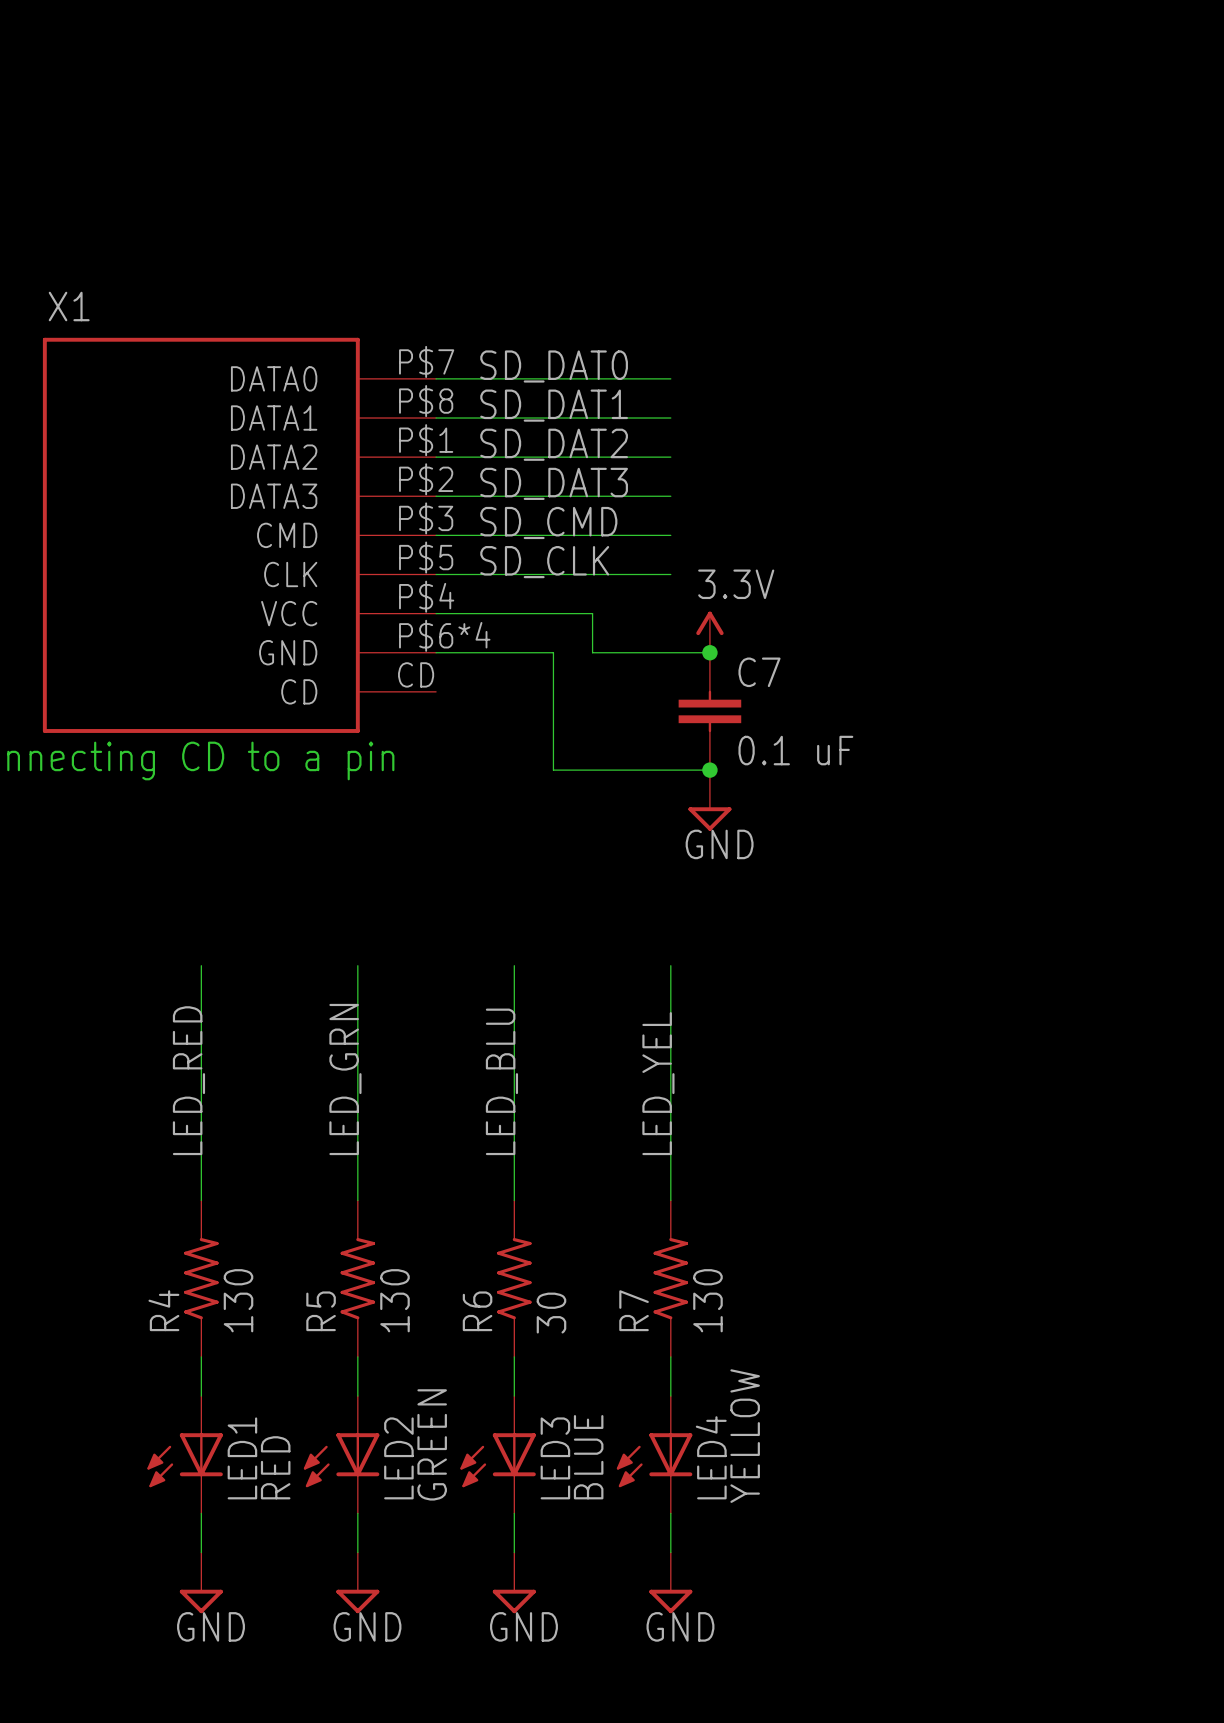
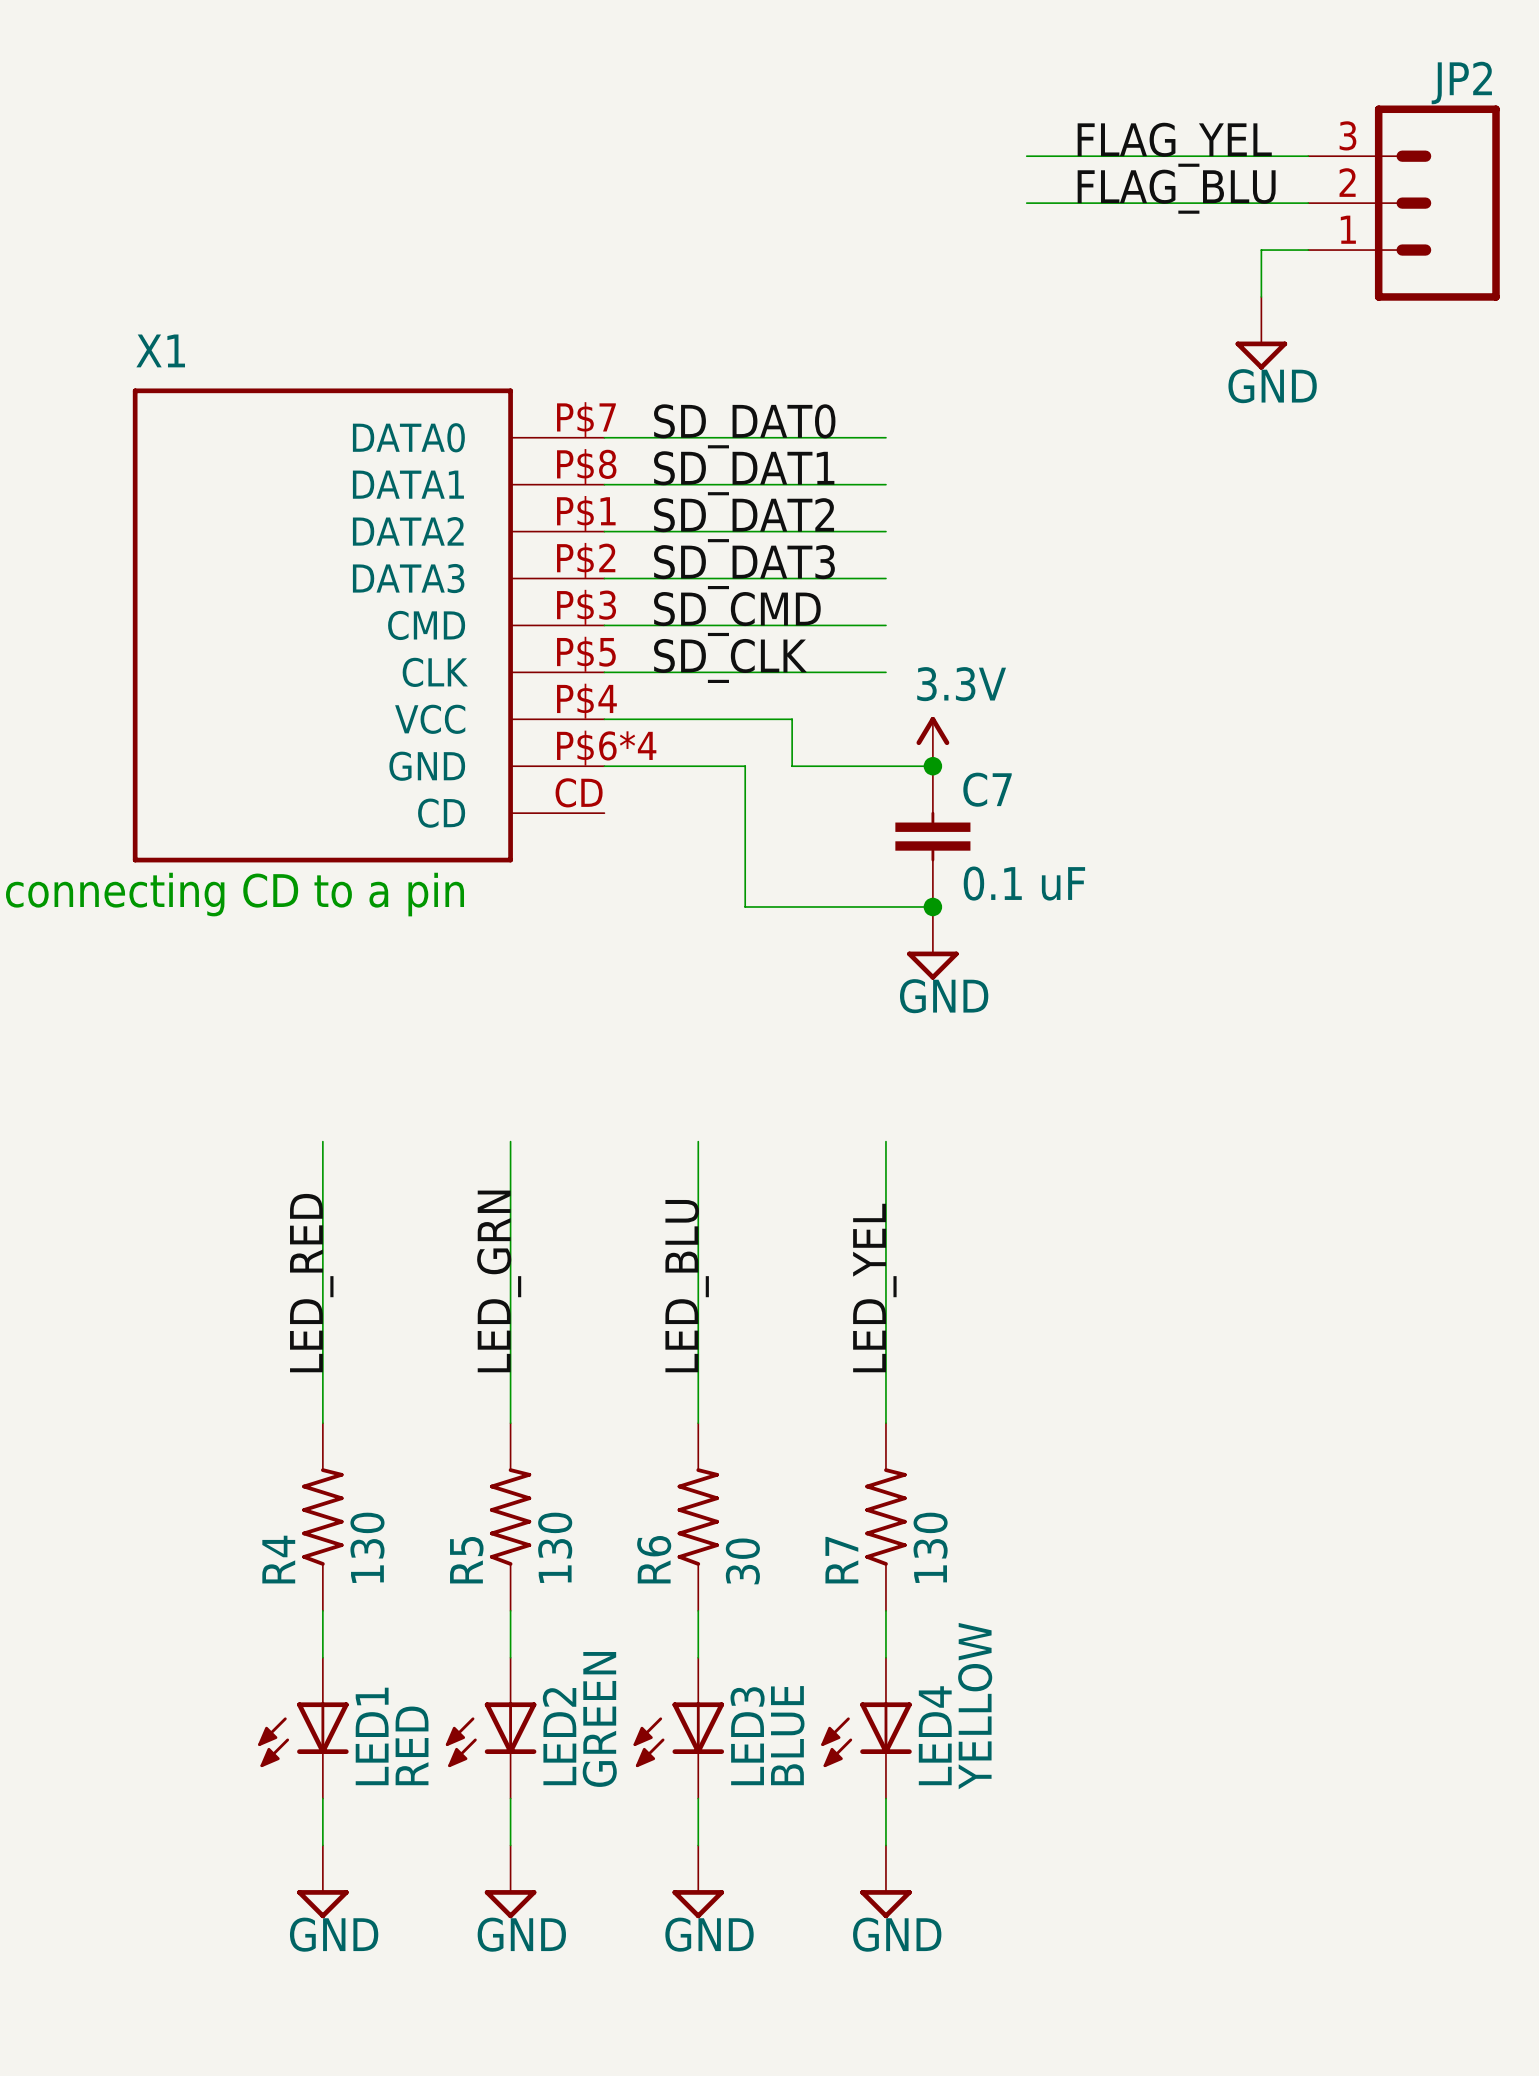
label: none -> FLAG_YEL (1174, 144)
wire: none -> (1026, 156) (1308, 156)
label: none -> FLAG_BLU (1176, 191)
wire: none -> (1026, 203) (1308, 203)
JP2: none -> (1404, 203)
wire: none -> (1308, 250) (1261, 250) (1261, 296)
power symbol: none -> GND (1261, 333)

